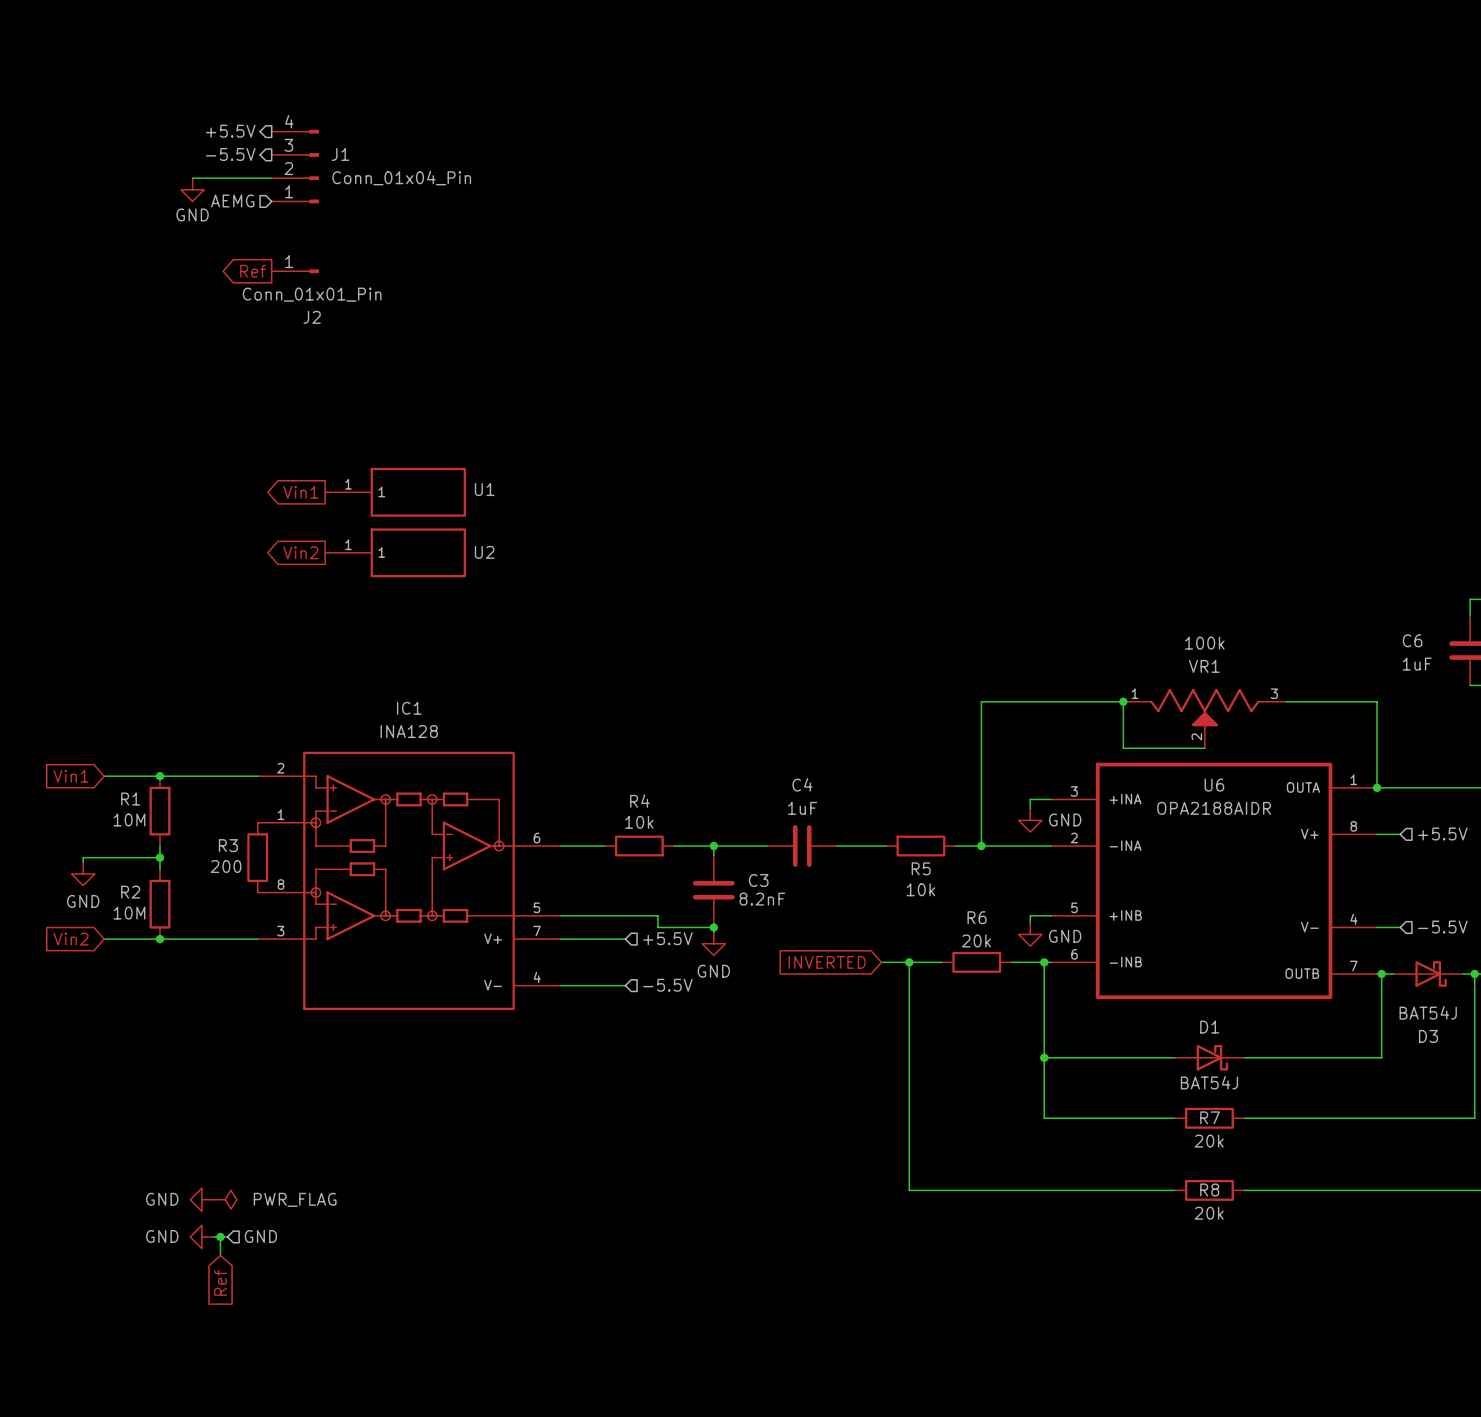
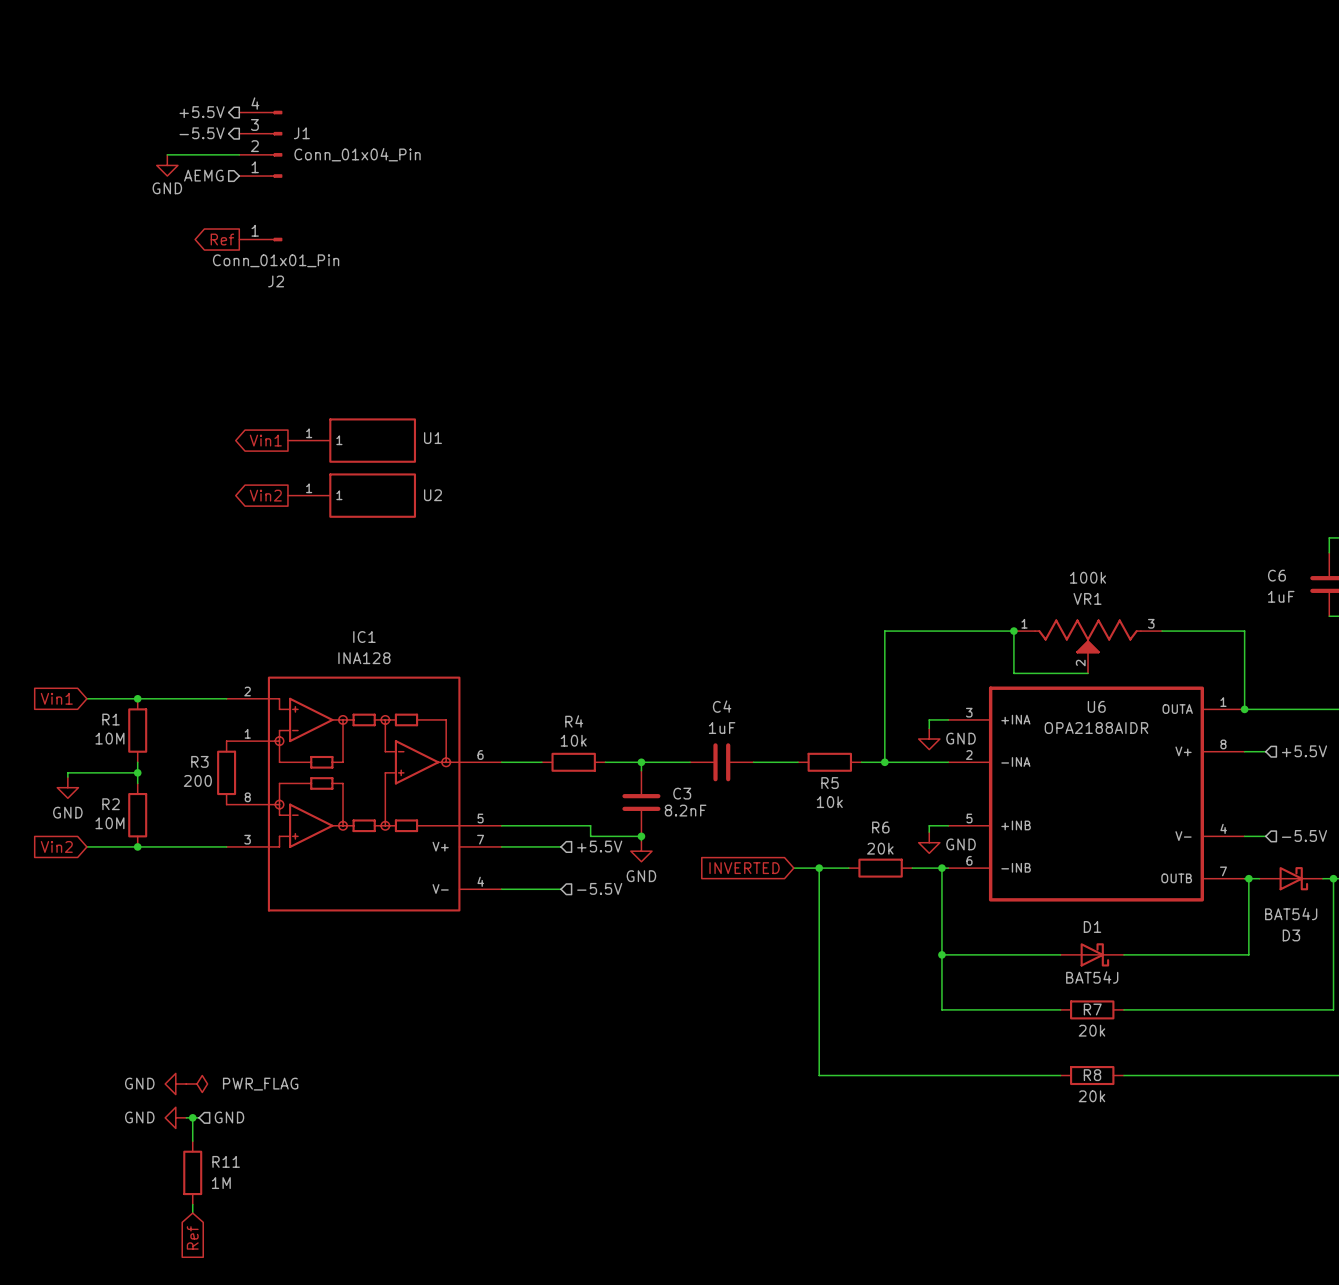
wire: none -> (192, 1134) (192, 1141)
global label position: Ref (220, 1282) -> Ref (192, 1237)
R11: none -> 1M (192, 1172)
wire: none -> (192, 1204) (192, 1213)

